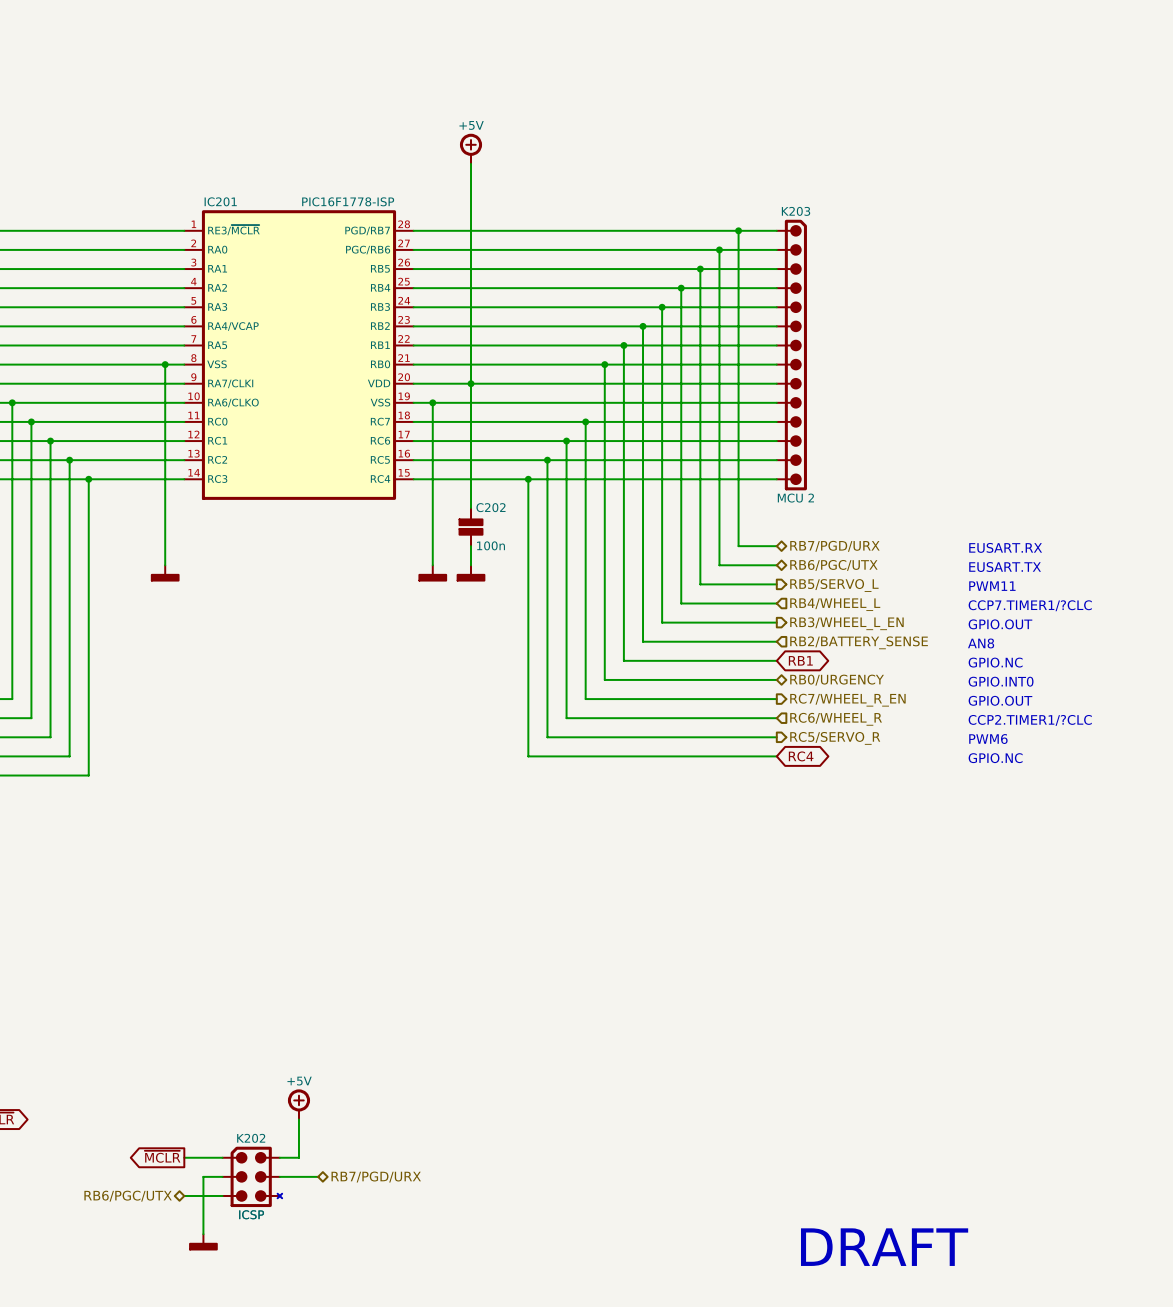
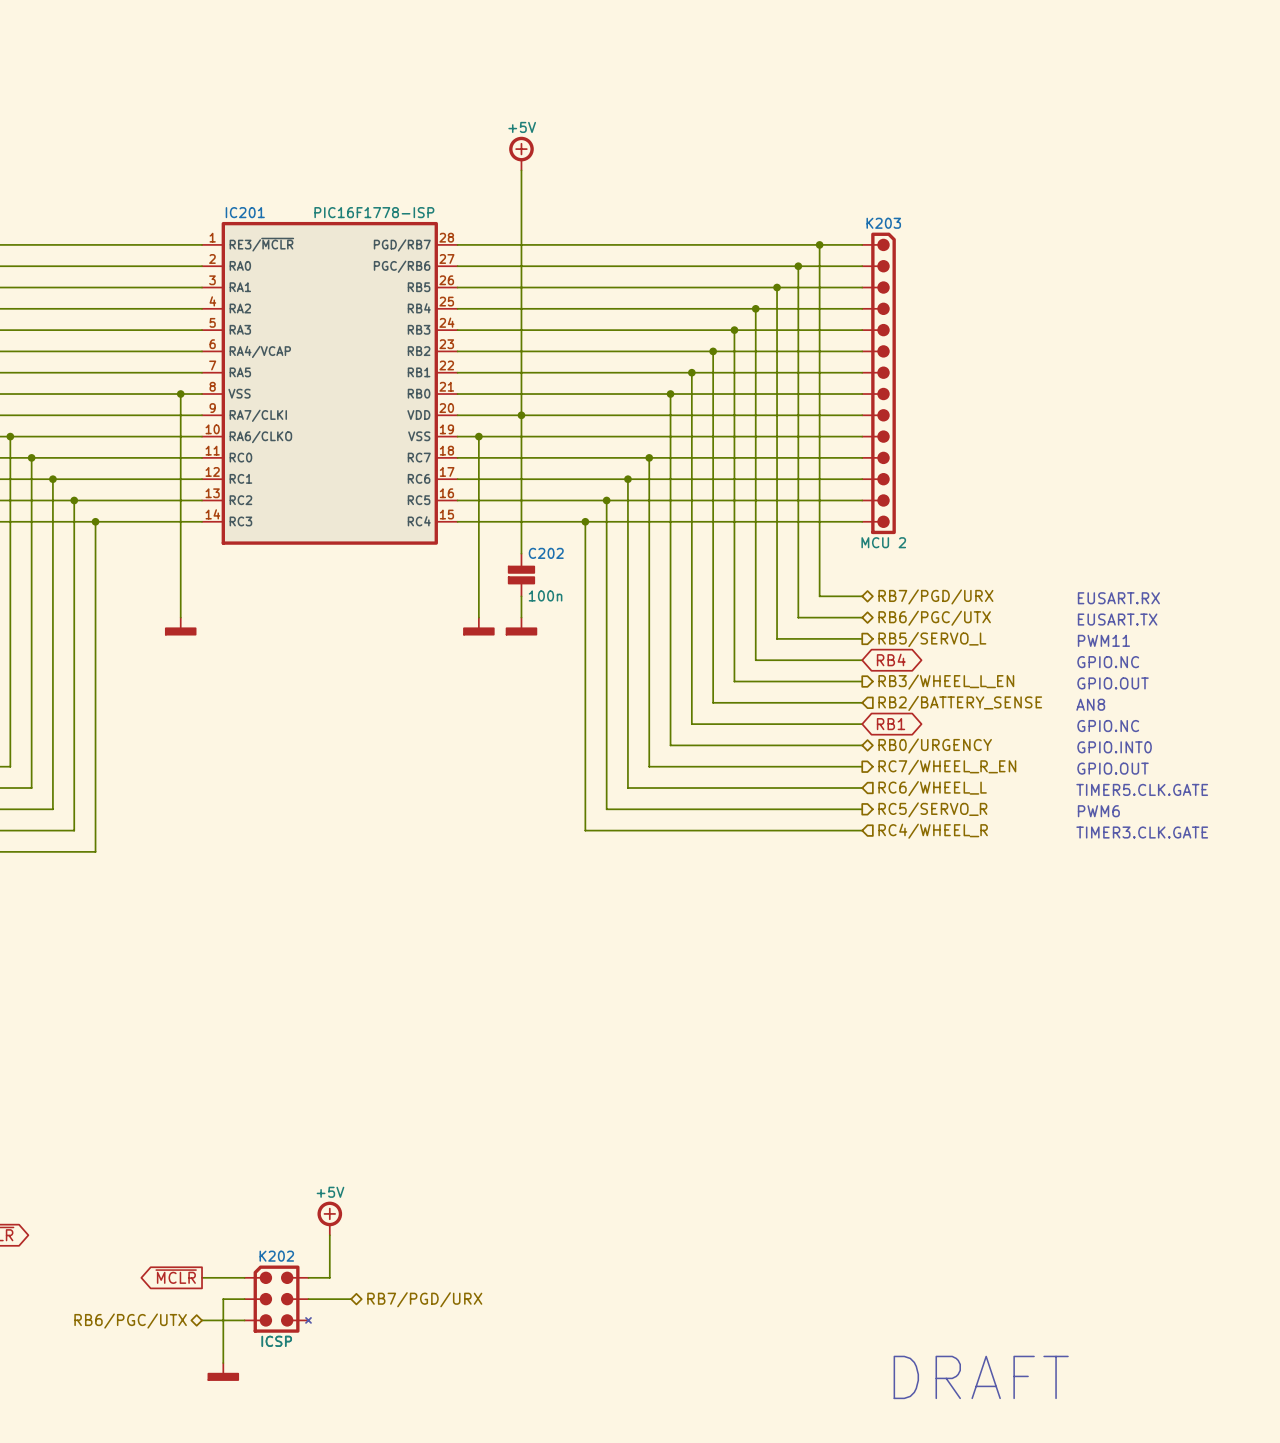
global label: none -> RB4 (891, 659)
hierarchical label: RB4/WHEEL_L (835, 604) -> none
text: CCP7.TIMER1/?CLC (1030, 605) -> GPIO.NC (1108, 662)
hierarchical label: RC6/WHEEL_R (836, 719) -> RC6/WHEEL_L (932, 788)
text: CCP2.TIMER1/?CLC (1030, 720) -> TIMER5.CLK.GATE (1142, 789)
global label: RC4 (801, 756) -> none
hierarchical label: none -> RC4/WHEEL_R (933, 831)
text: GPIO.NC (995, 758) -> TIMER3.CLK.GATE (1142, 832)

